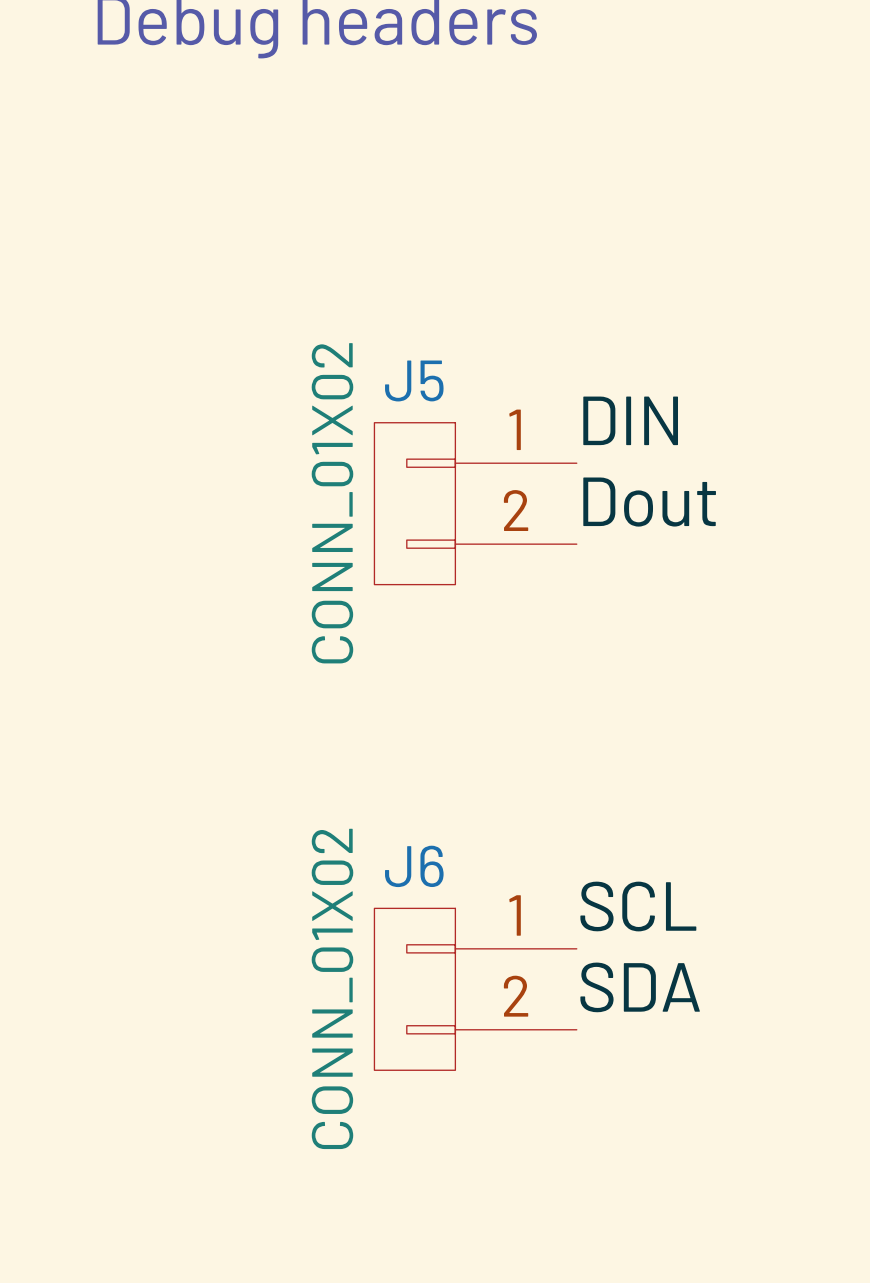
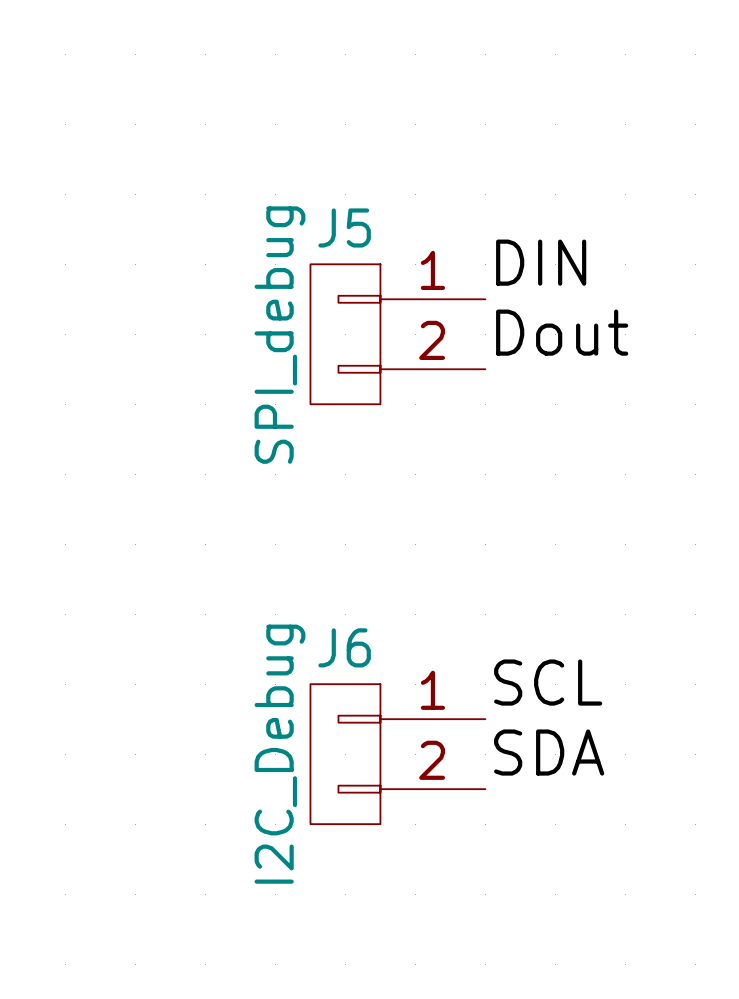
J5 value: CONN_01X02 (332, 503) -> SPI_debug (279, 335)
J6 value: CONN_01X02 (332, 988) -> I2C_Debug (279, 754)

